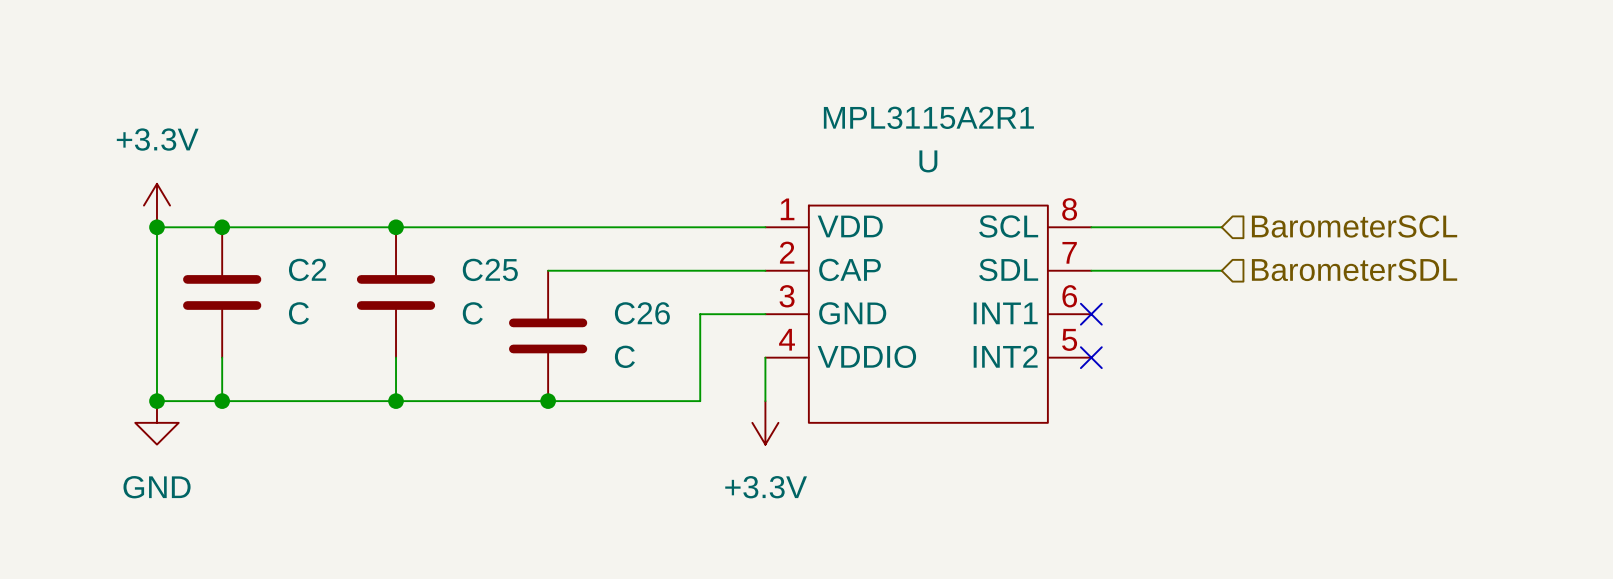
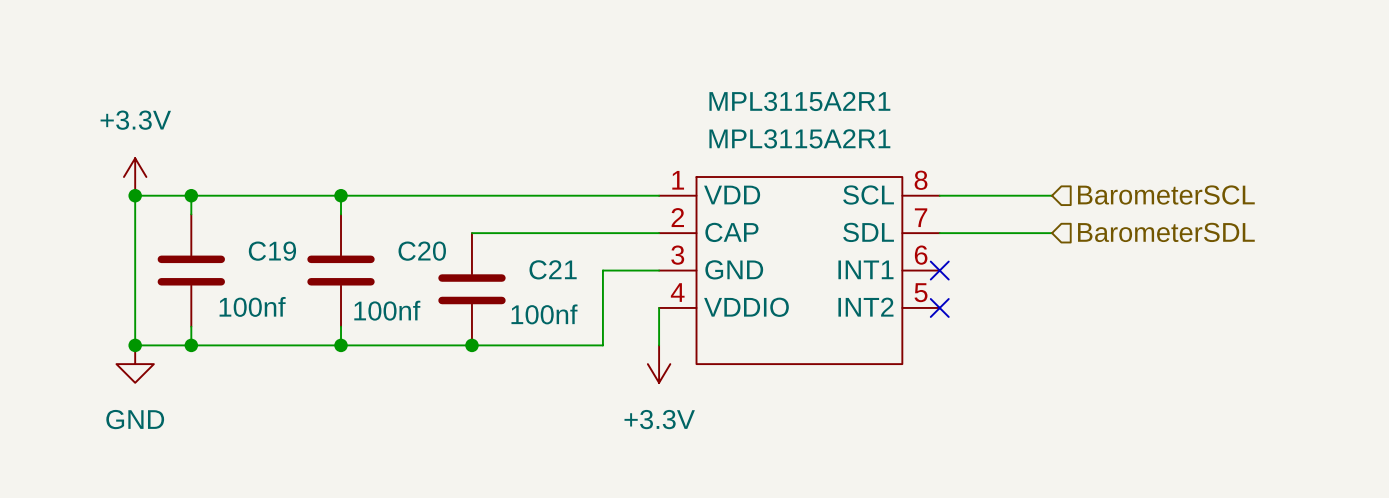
MPL3115A2R1 value: U (928, 161) -> MPL3115A2R1 (799, 138)
C2: C (222, 292) -> none
C25: C (396, 292) -> none
C26 name: C26 (642, 313) -> C21 (553, 269)
C19: none -> 100nf (191, 270)
C20: none -> 100nf (341, 270)
C26 value: C (624, 356) -> 100nf (544, 314)

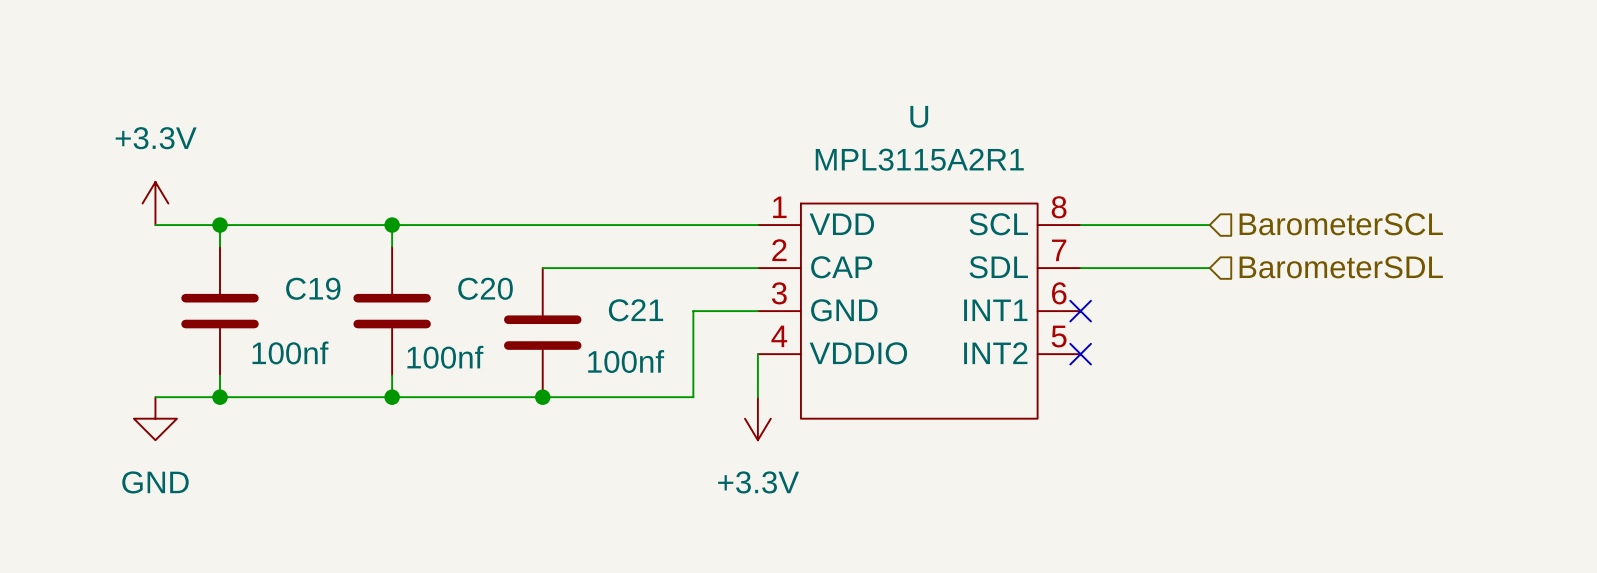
MPL3115A2R1 name: MPL3115A2R1 (799, 101) -> U (919, 116)
wire: (135, 195) (135, 345) -> none
junction: (135, 195) -> none
junction: (135, 345) -> none

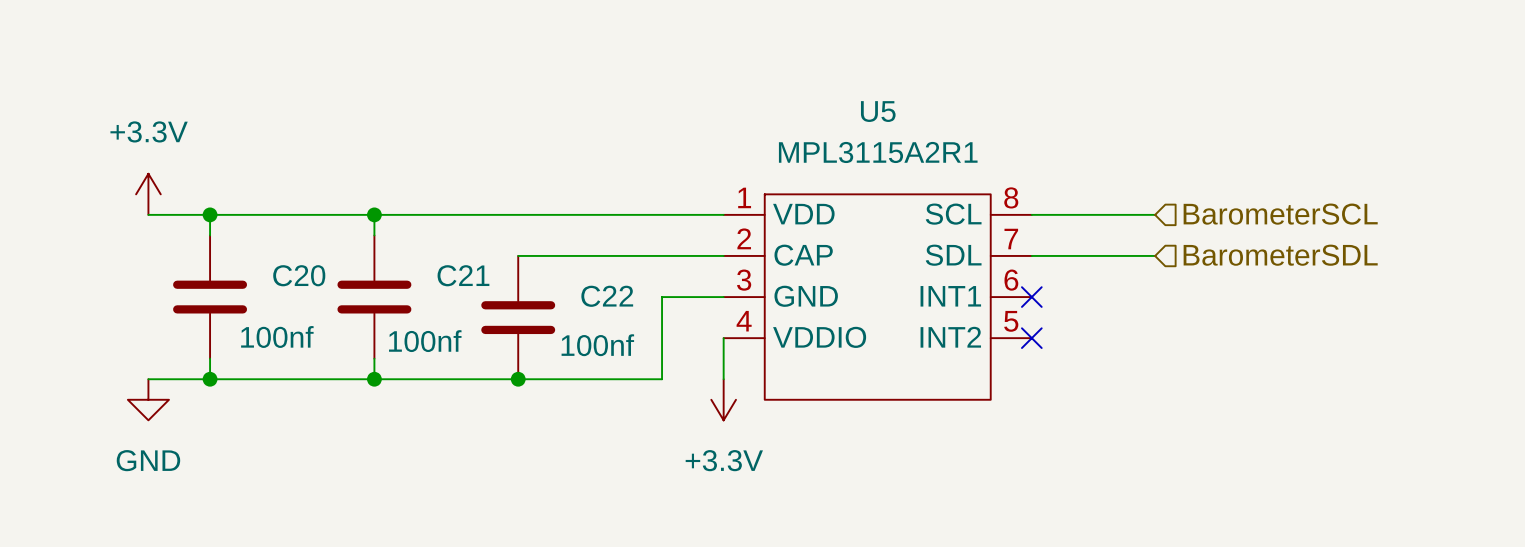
U name: U (919, 116) -> U5 (878, 111)
C19 name: C19 (313, 288) -> C20 (299, 275)
C20 name: C20 (485, 288) -> C21 (463, 275)
C21 name: C21 (636, 310) -> C22 (607, 296)

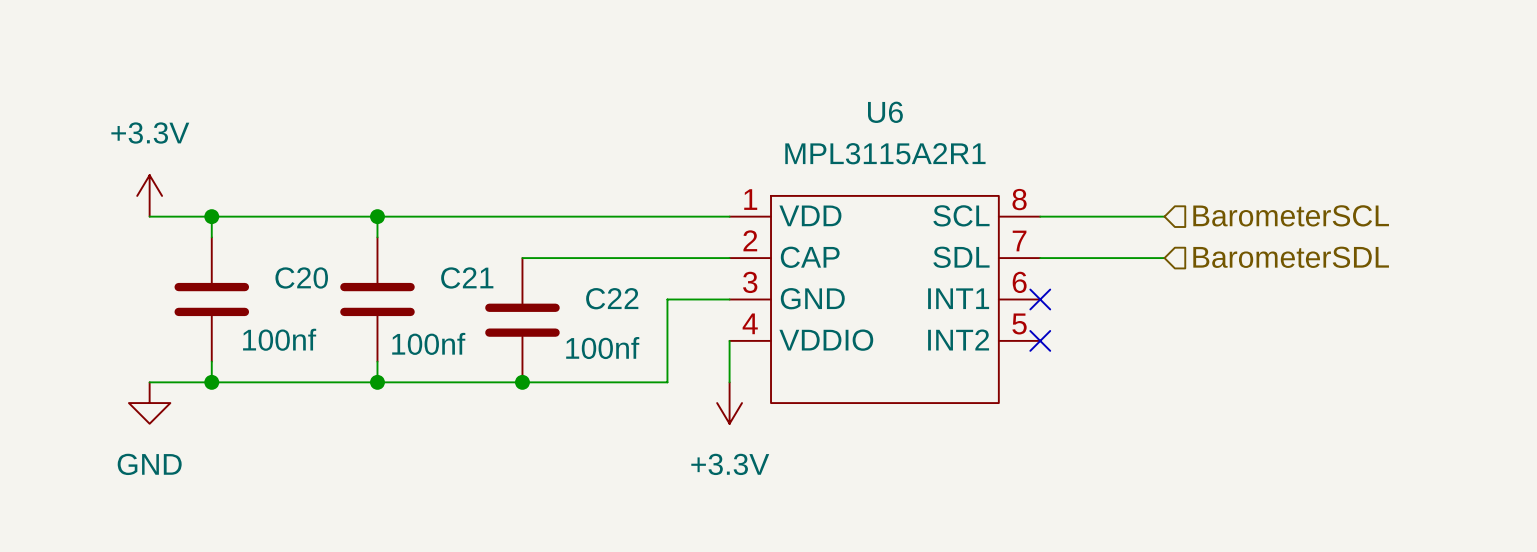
U5 name: U5 (878, 111) -> U6 (885, 112)

